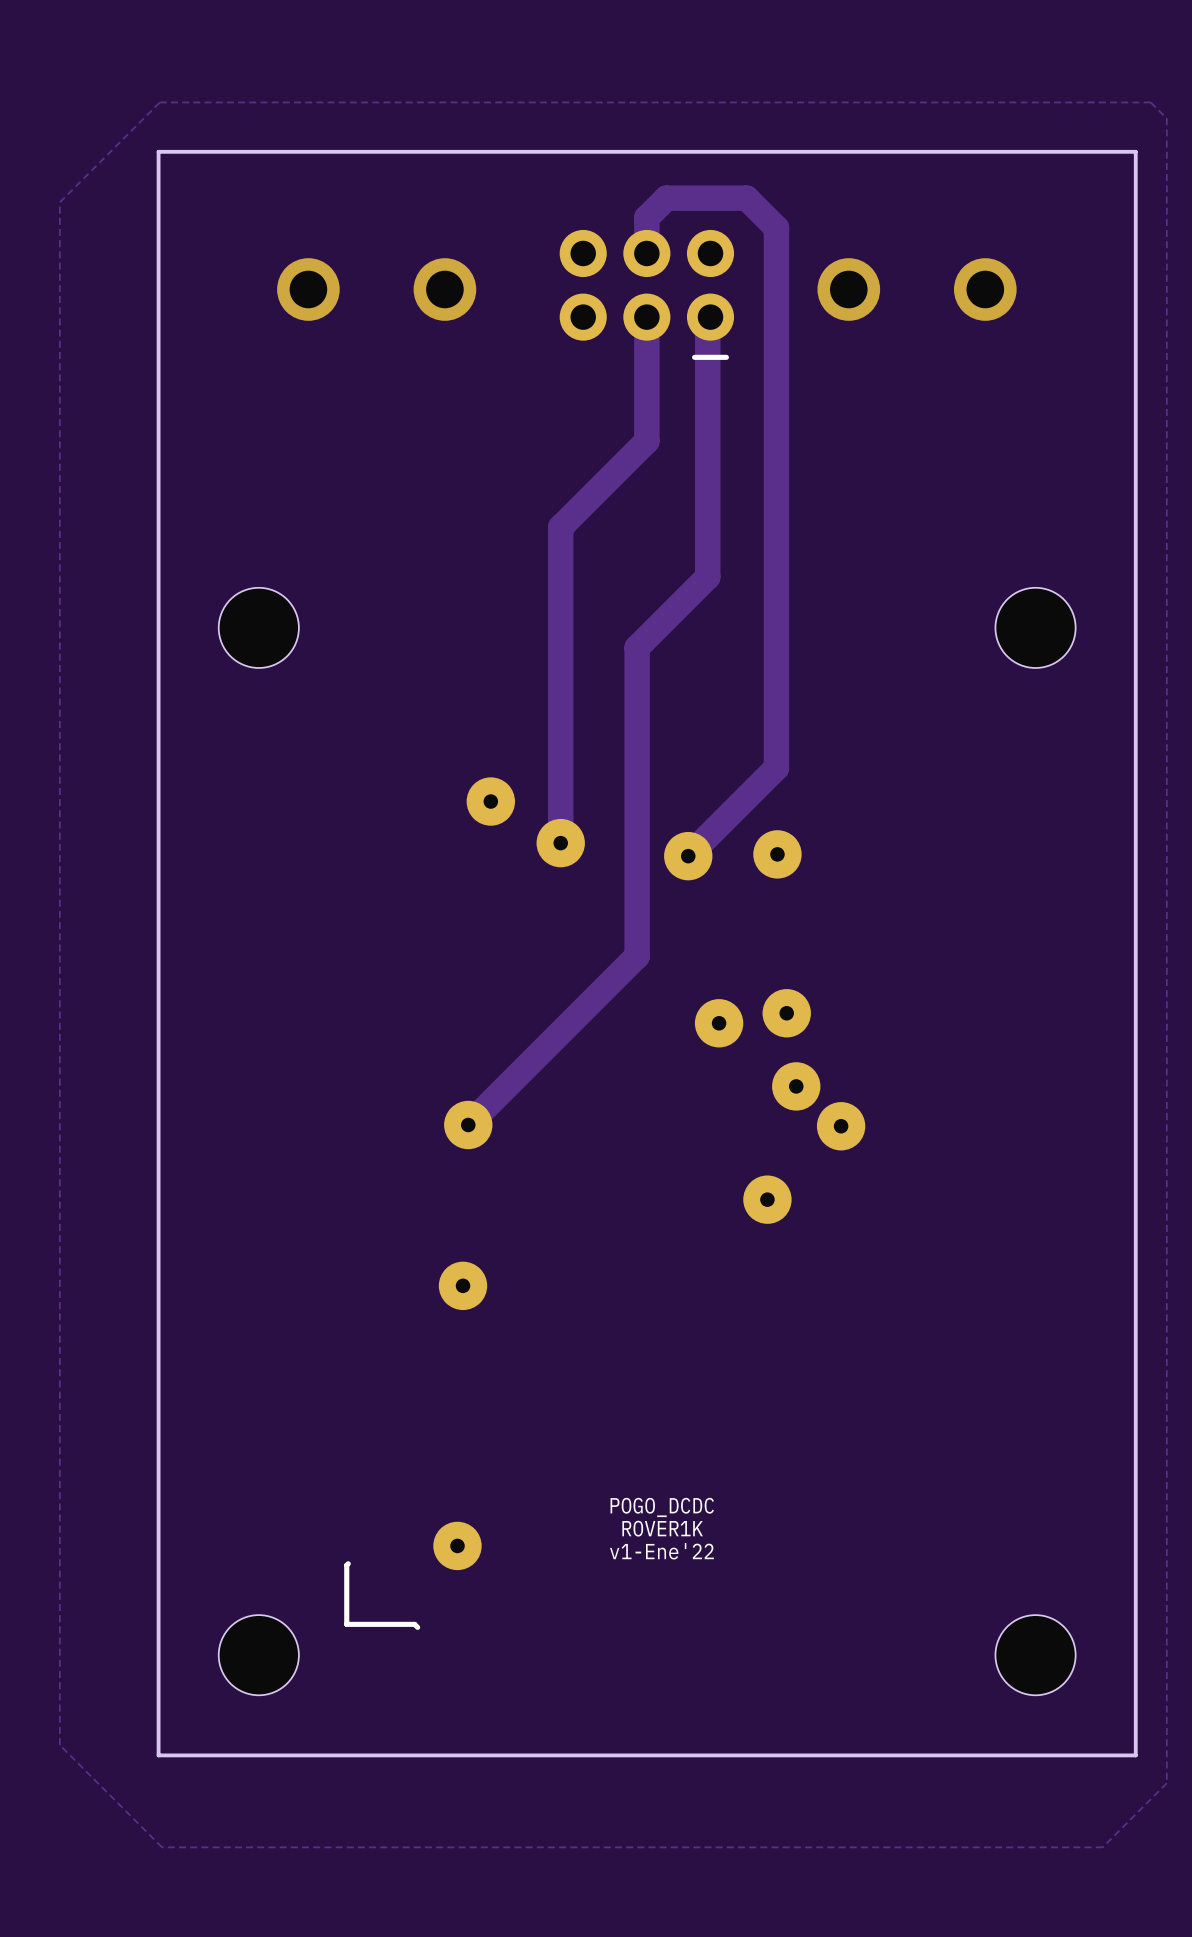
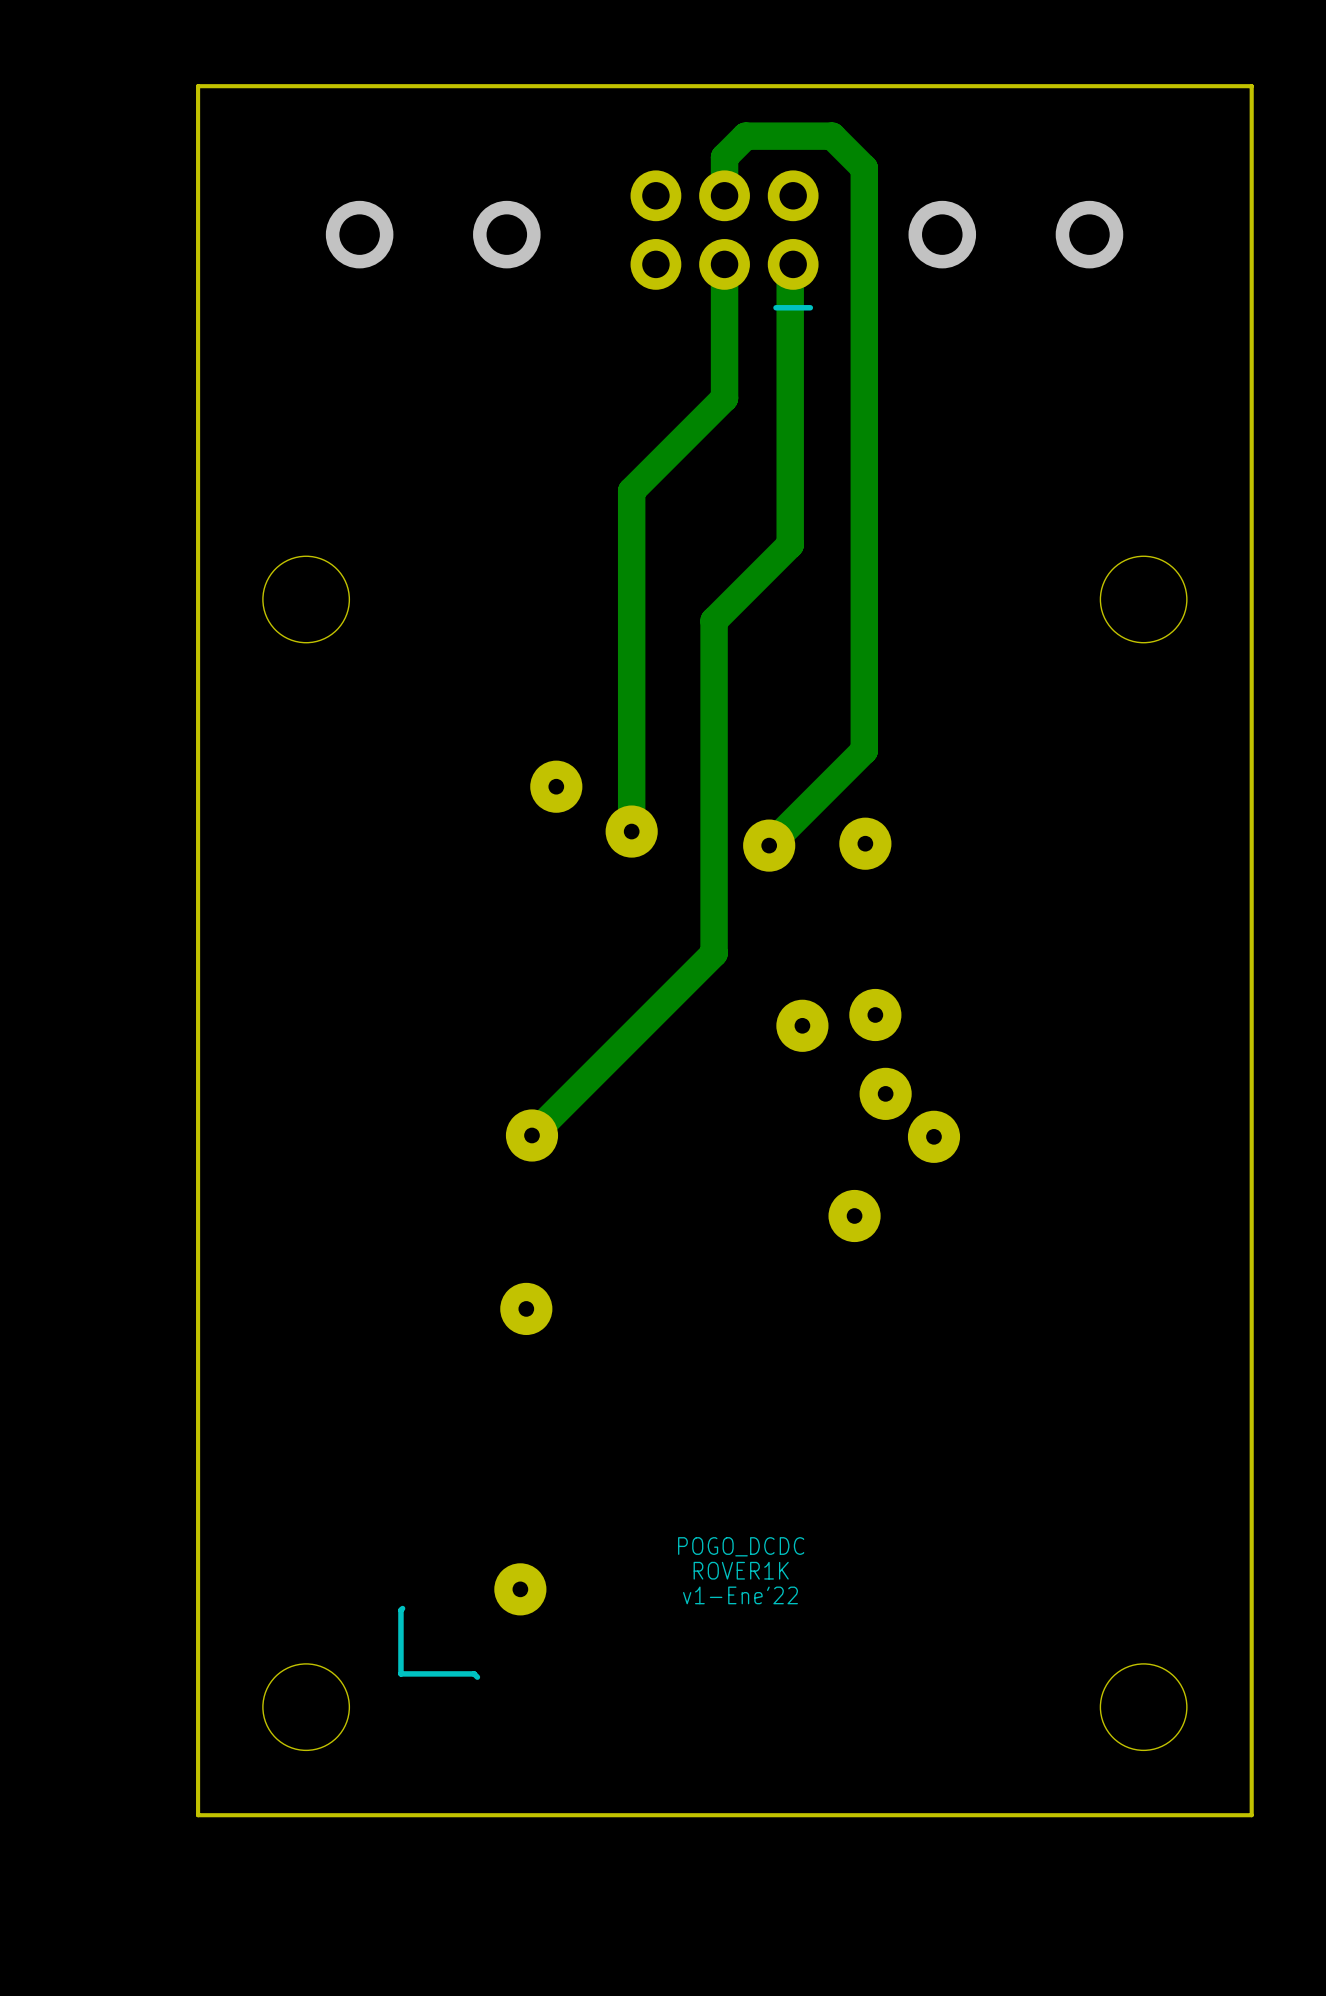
zone outline: (1166, 118) (1166, 1783) (1102, 1847) (162, 1847) (59, 1745) (59, 202) (159, 102) (1150, 102) (1166, 118) -> none

